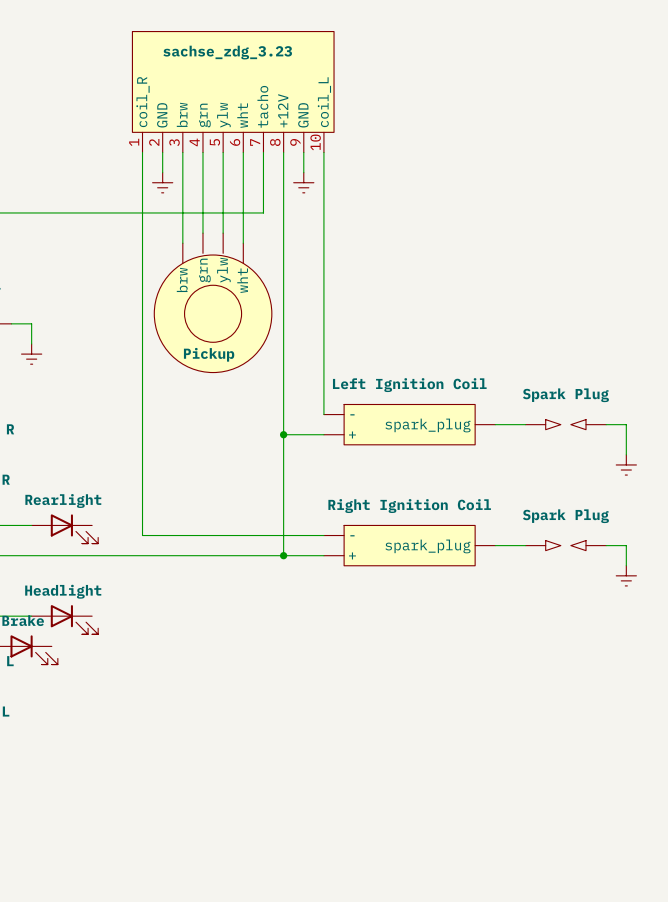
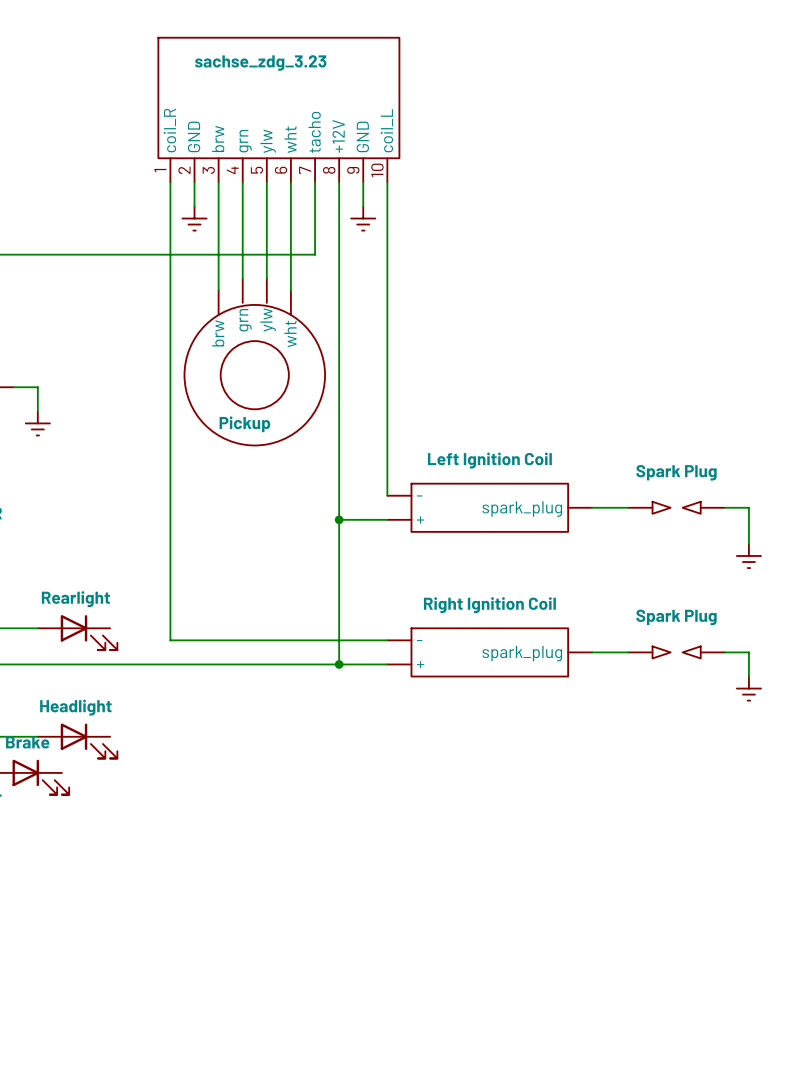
part symbol: [132, 31, 335, 153] -> [158, 37, 400, 183]
part symbol: [154, 233, 272, 373] -> [184, 278, 326, 446]
part symbol: [323, 404, 496, 445] -> [387, 483, 593, 532]
part symbol: [323, 525, 496, 566] -> [387, 628, 593, 677]

